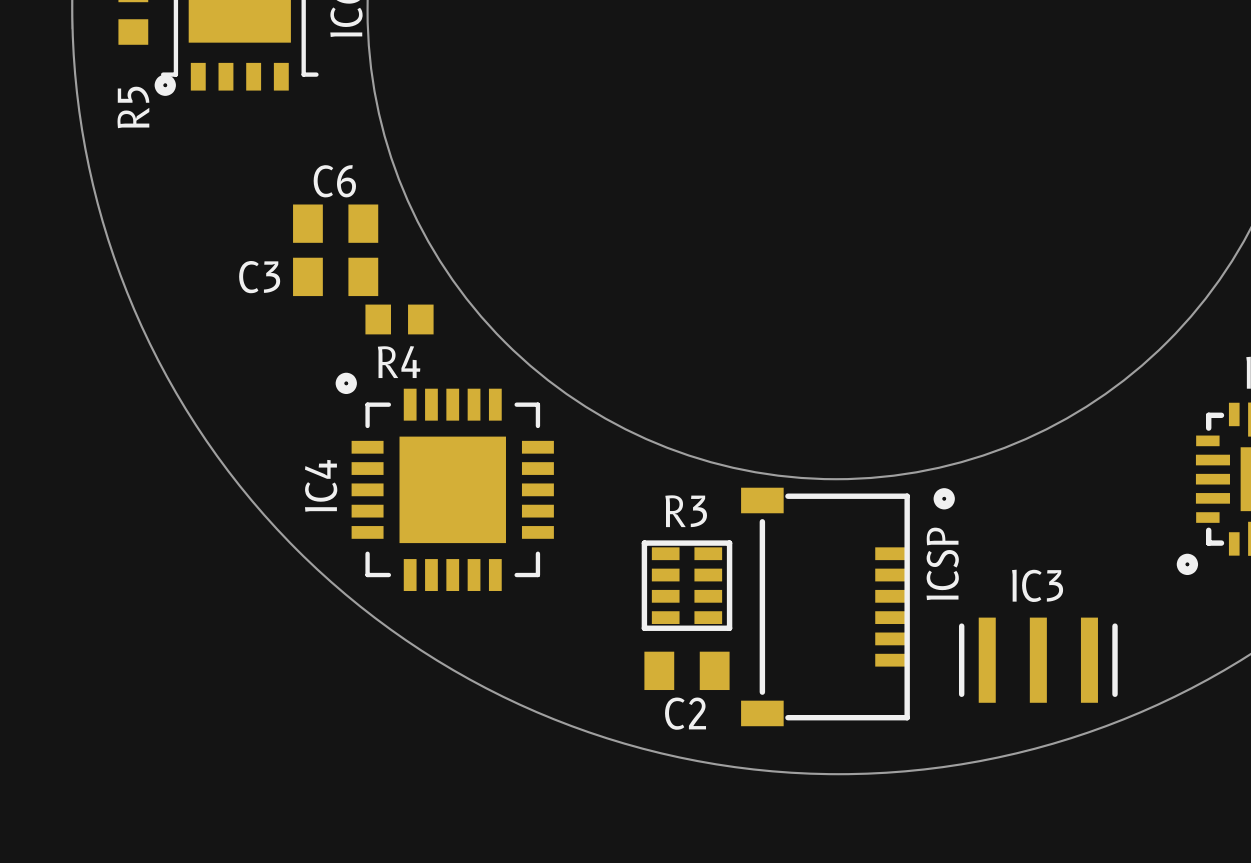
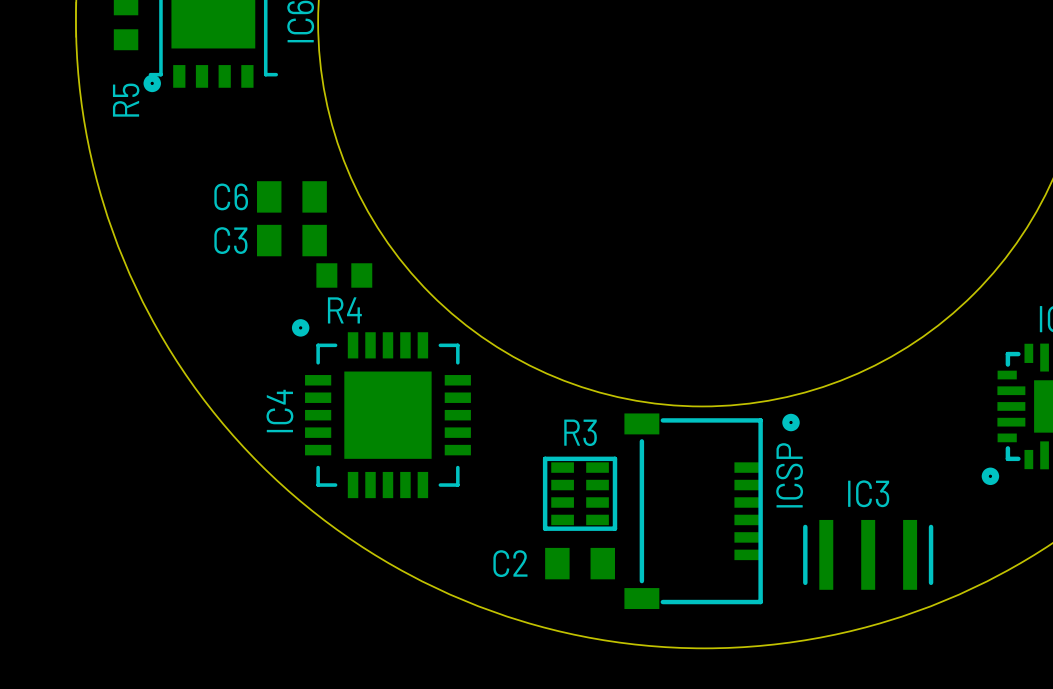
C6 name position: C6 (334, 181) -> C6 (231, 196)
C2 name position: C2 (685, 713) -> C2 (510, 563)

